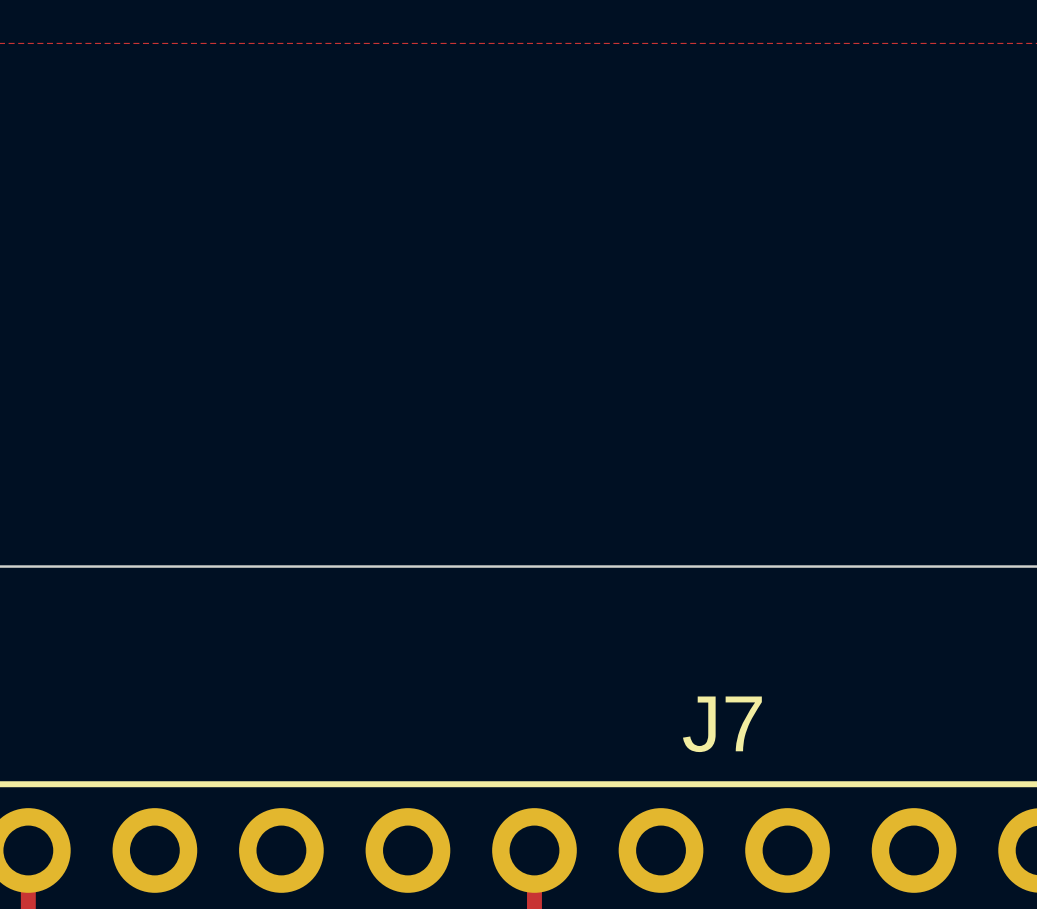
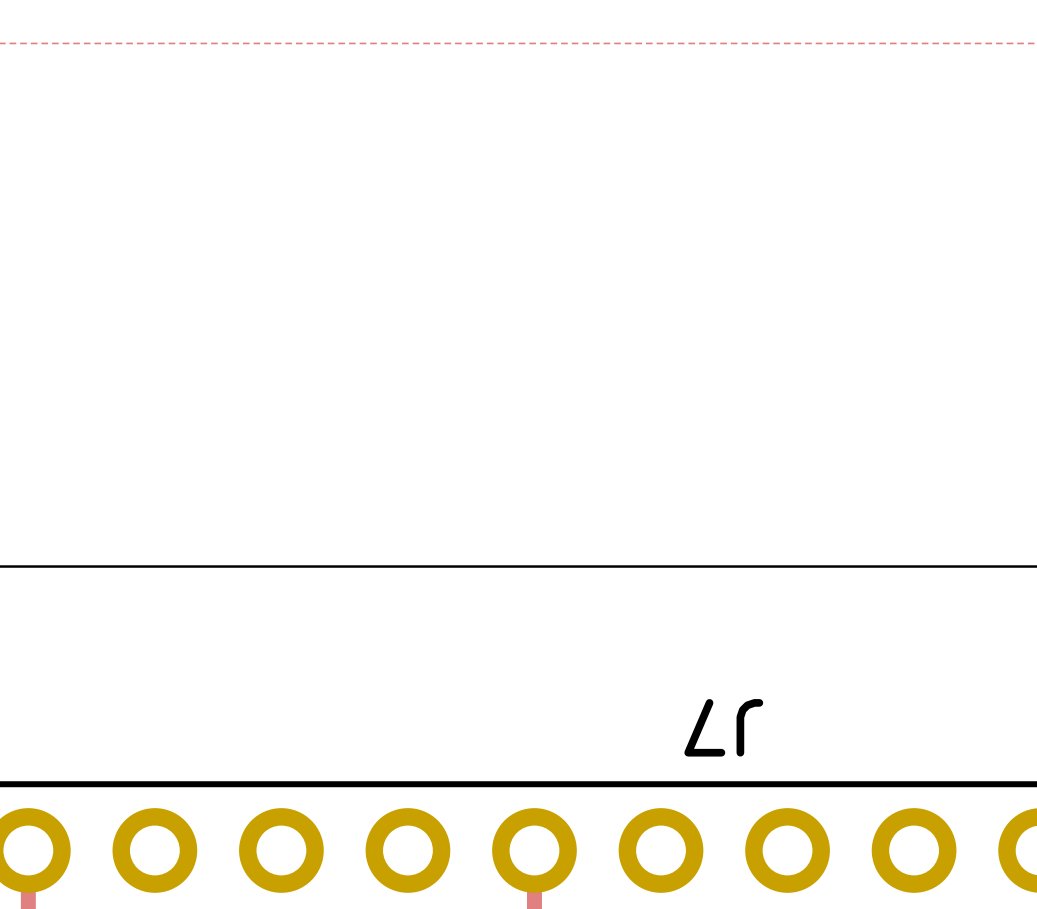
J7 name rotation: 0° (722, 724) -> 180° (723, 727)

